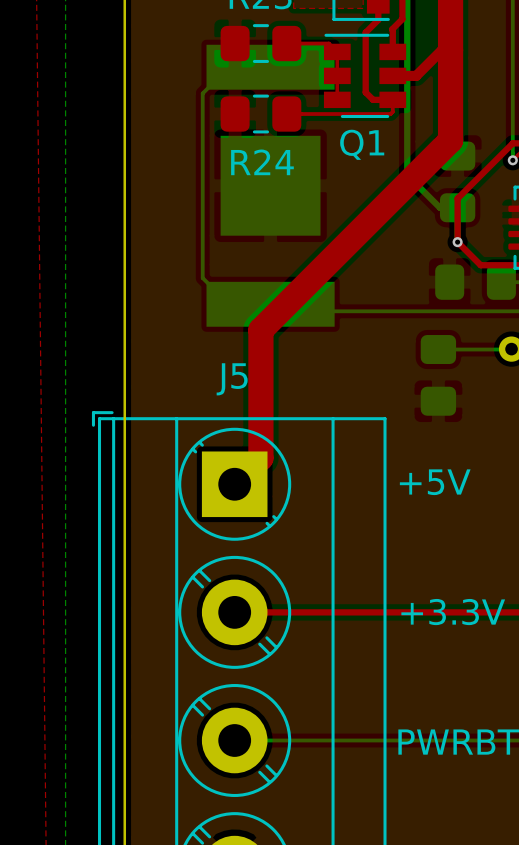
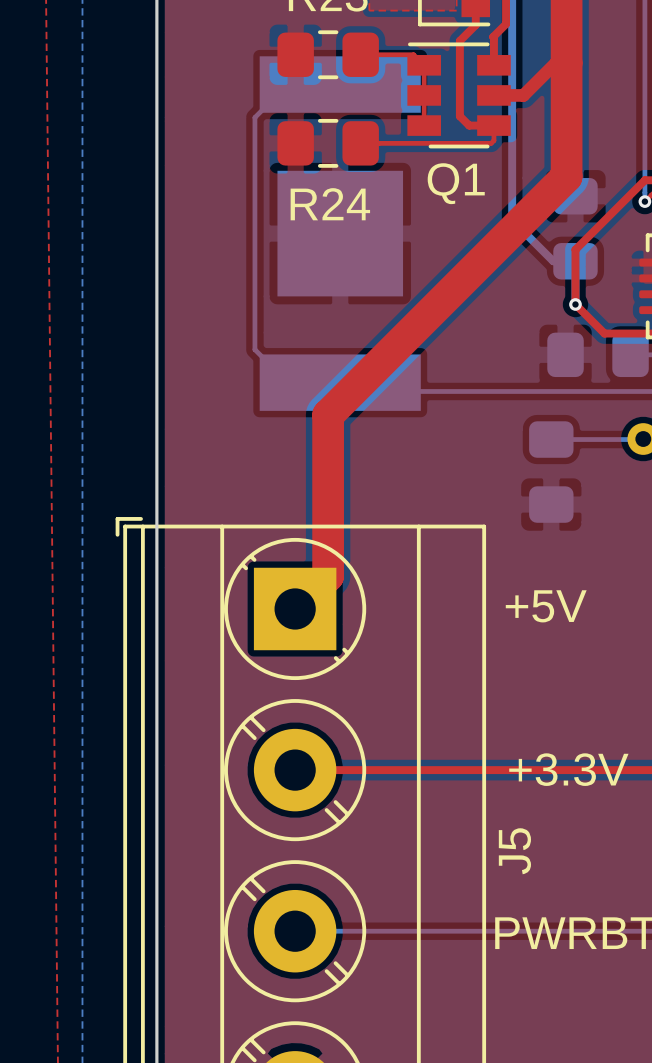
J5 name rotation: 0° (232, 379) -> 90° counterclockwise (514, 851)
J5 name position: J5 (232, 379) -> J5 (514, 851)

